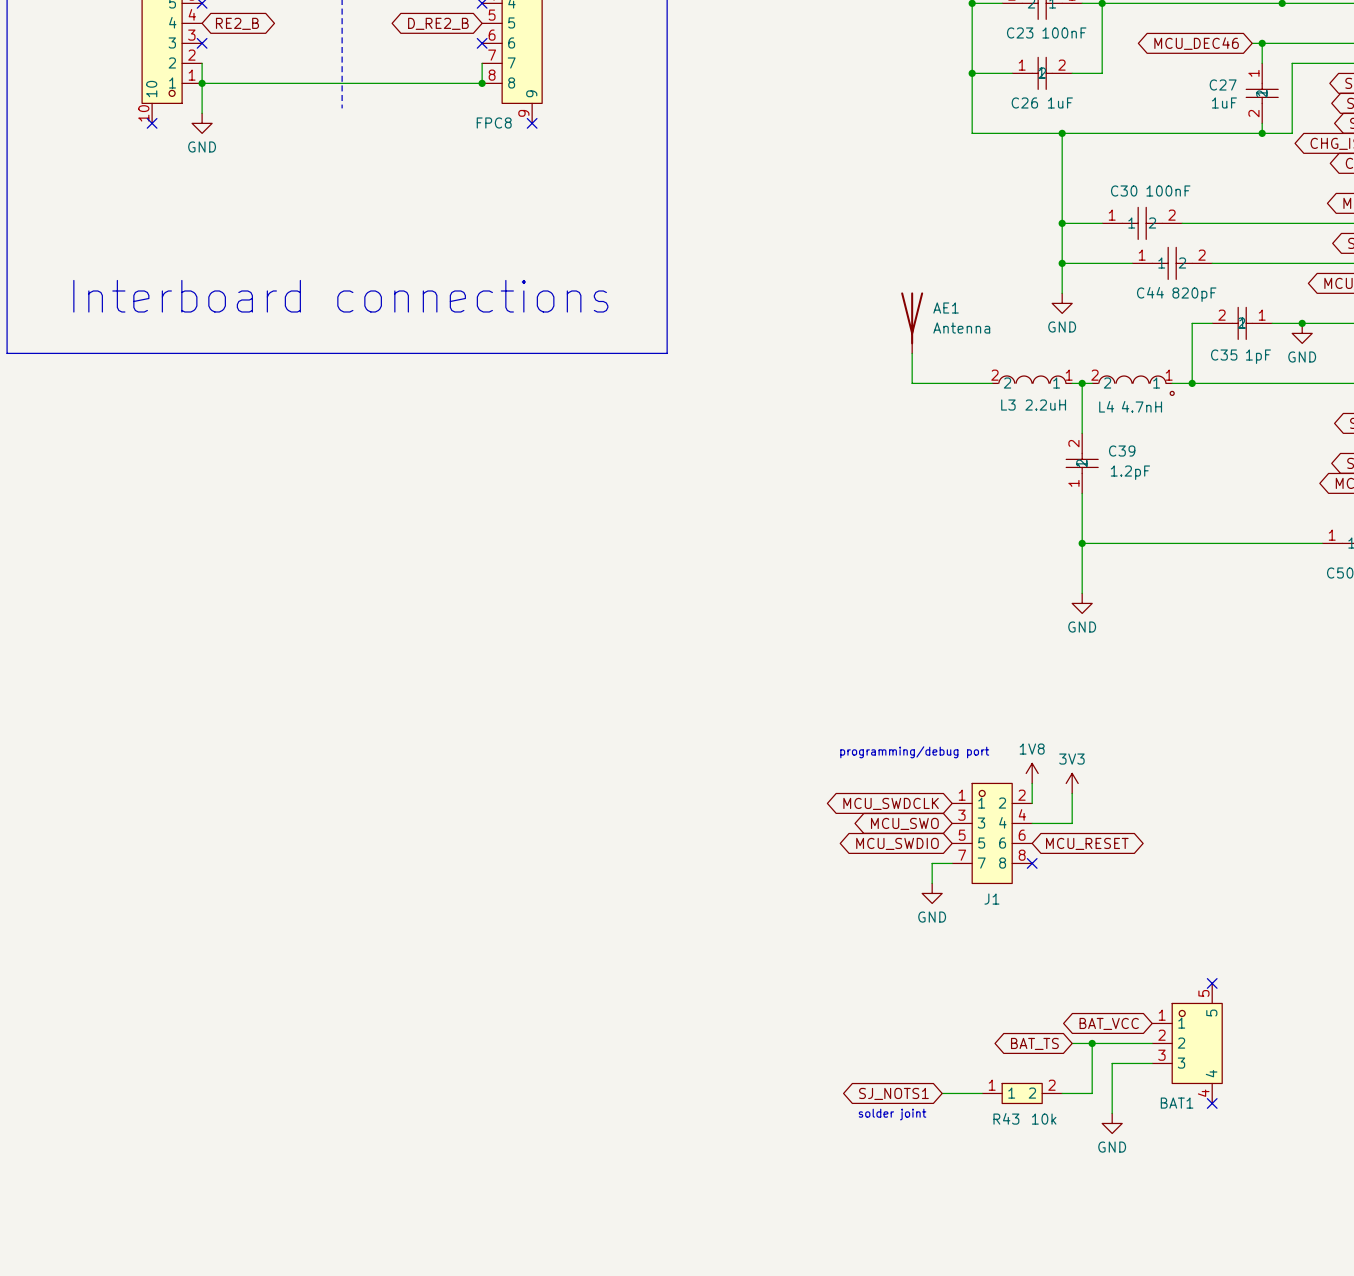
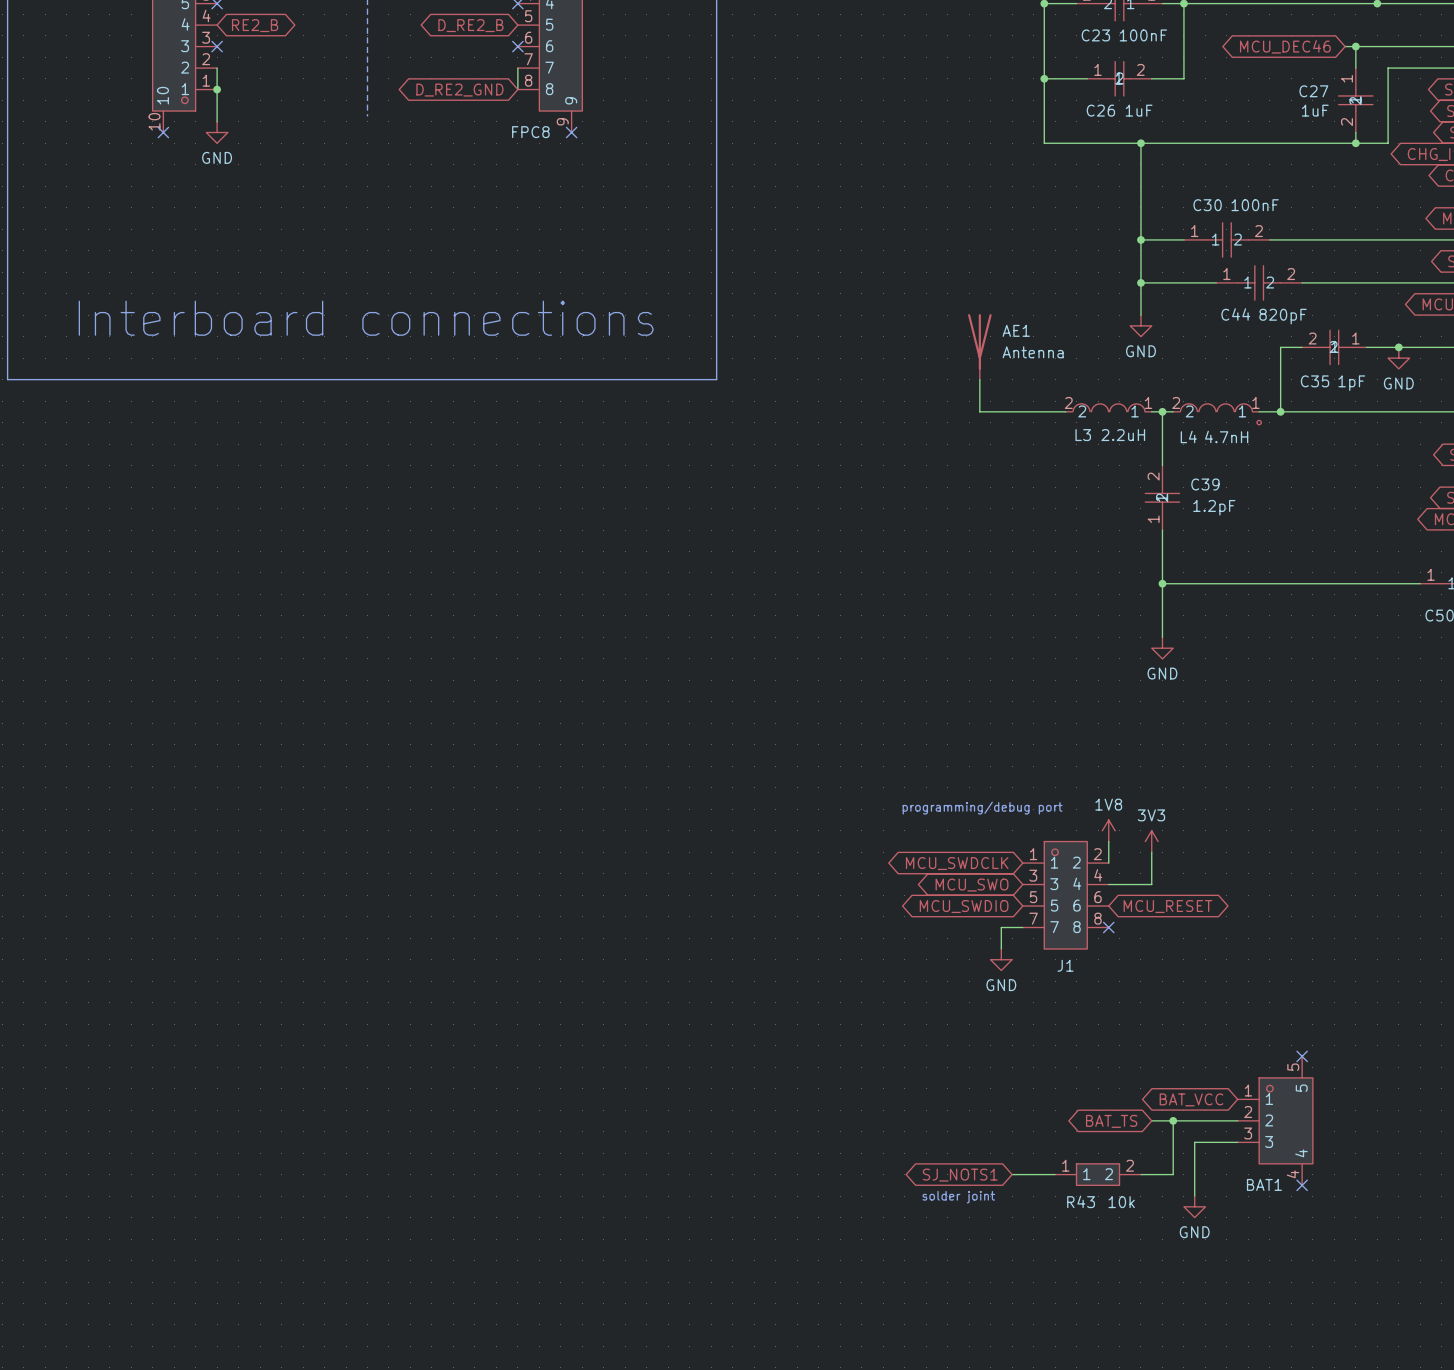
wire: (202, 83) (482, 83) -> none
global label: none -> D_RE2_GND (459, 90)
junction: (482, 83) -> none

